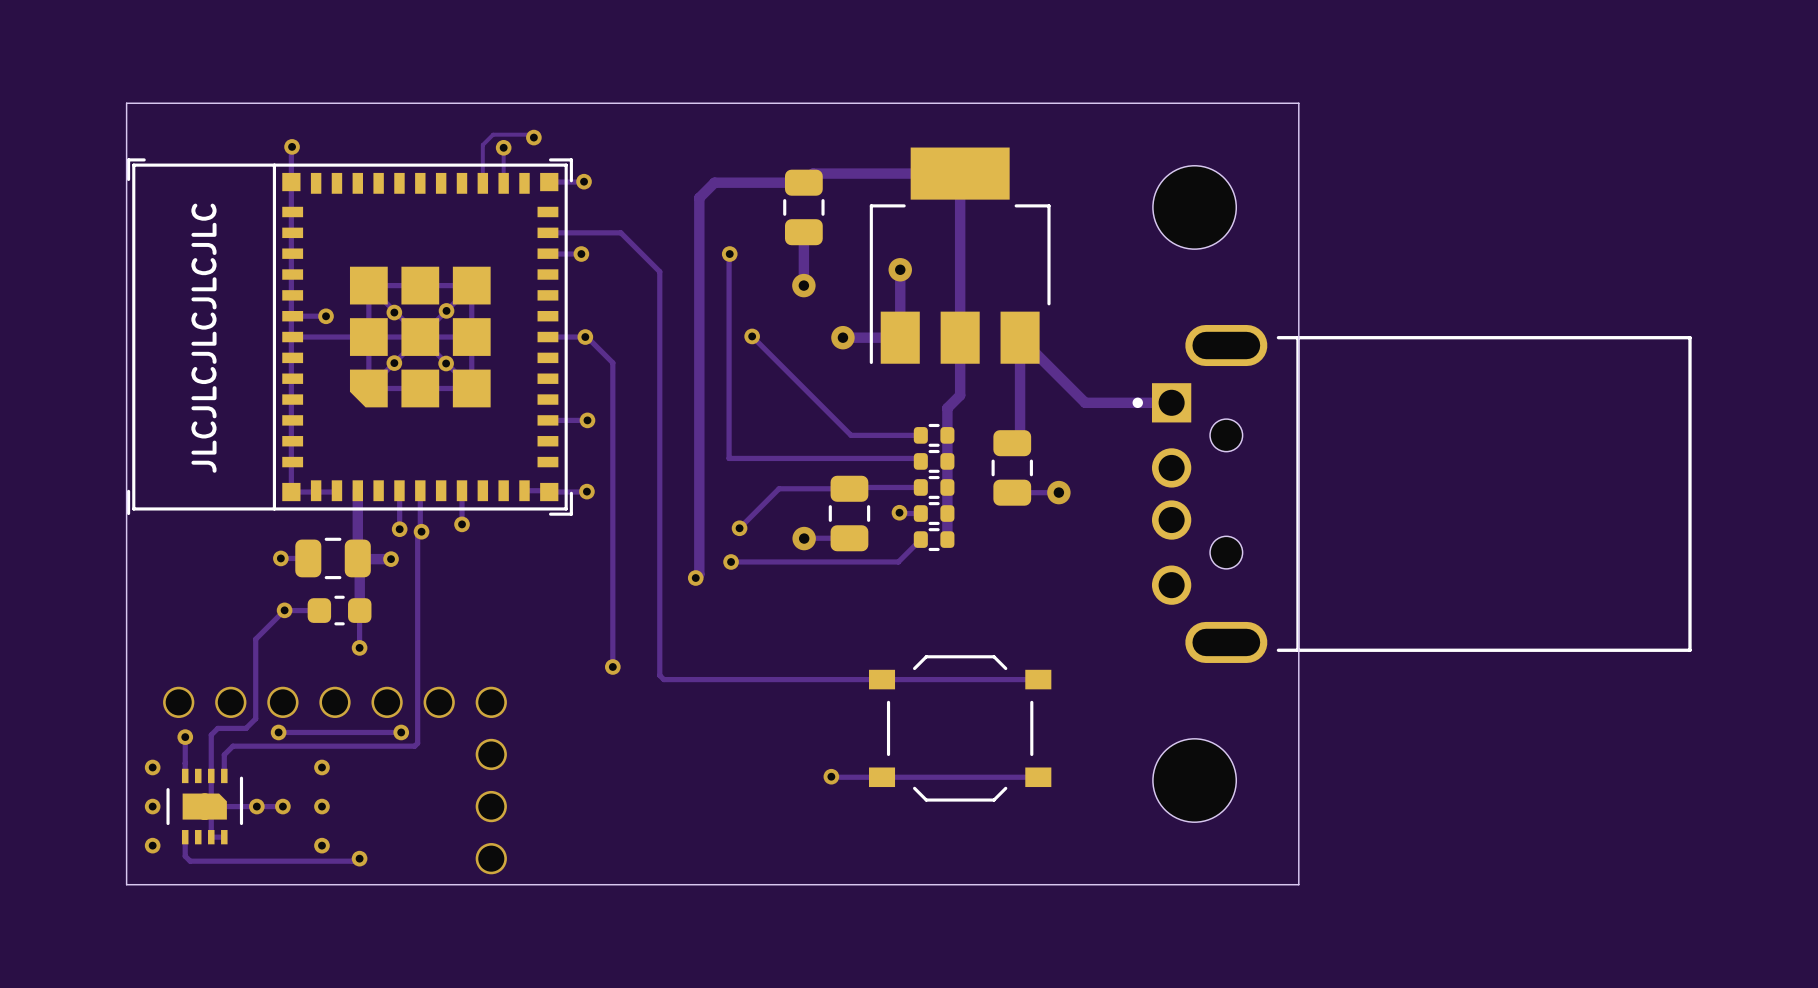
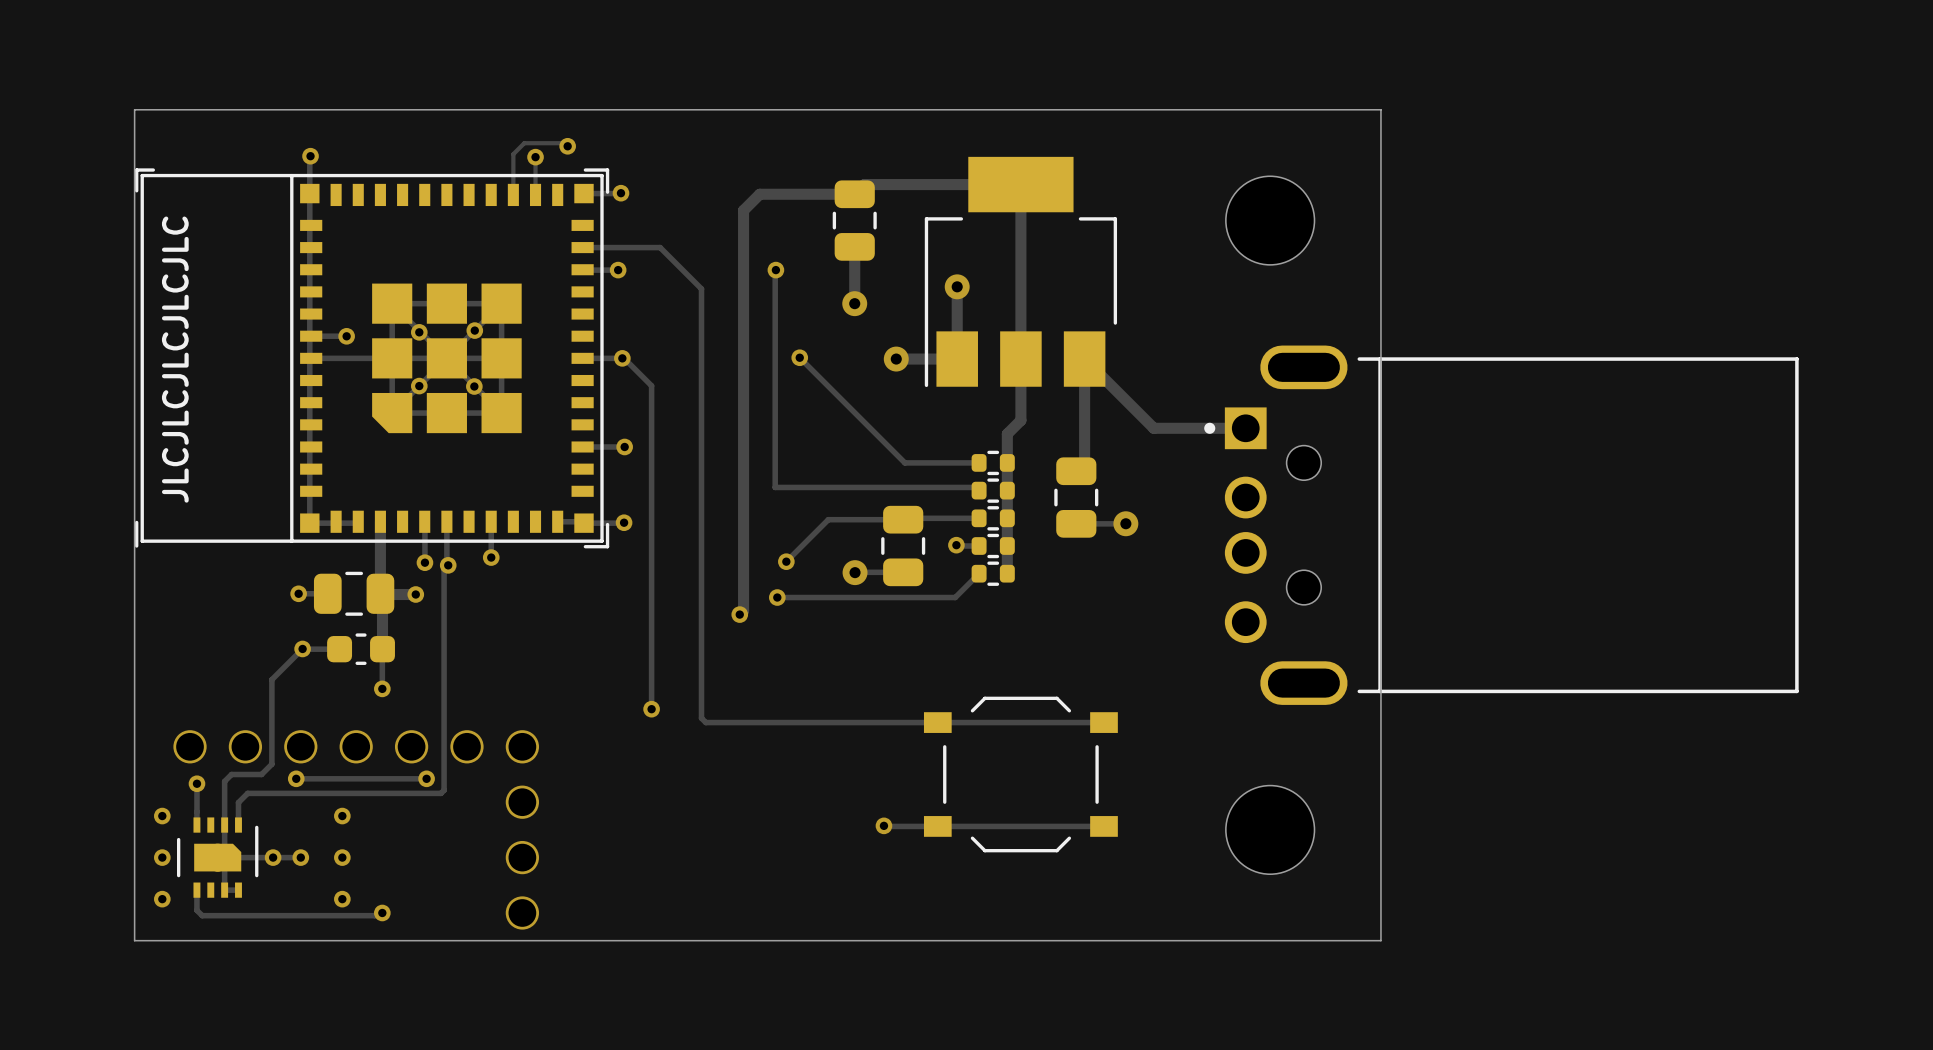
text position: JLCJLCJLCJLCJLC (203, 338) -> JLCJLCJLCJLCJLC (175, 359)

